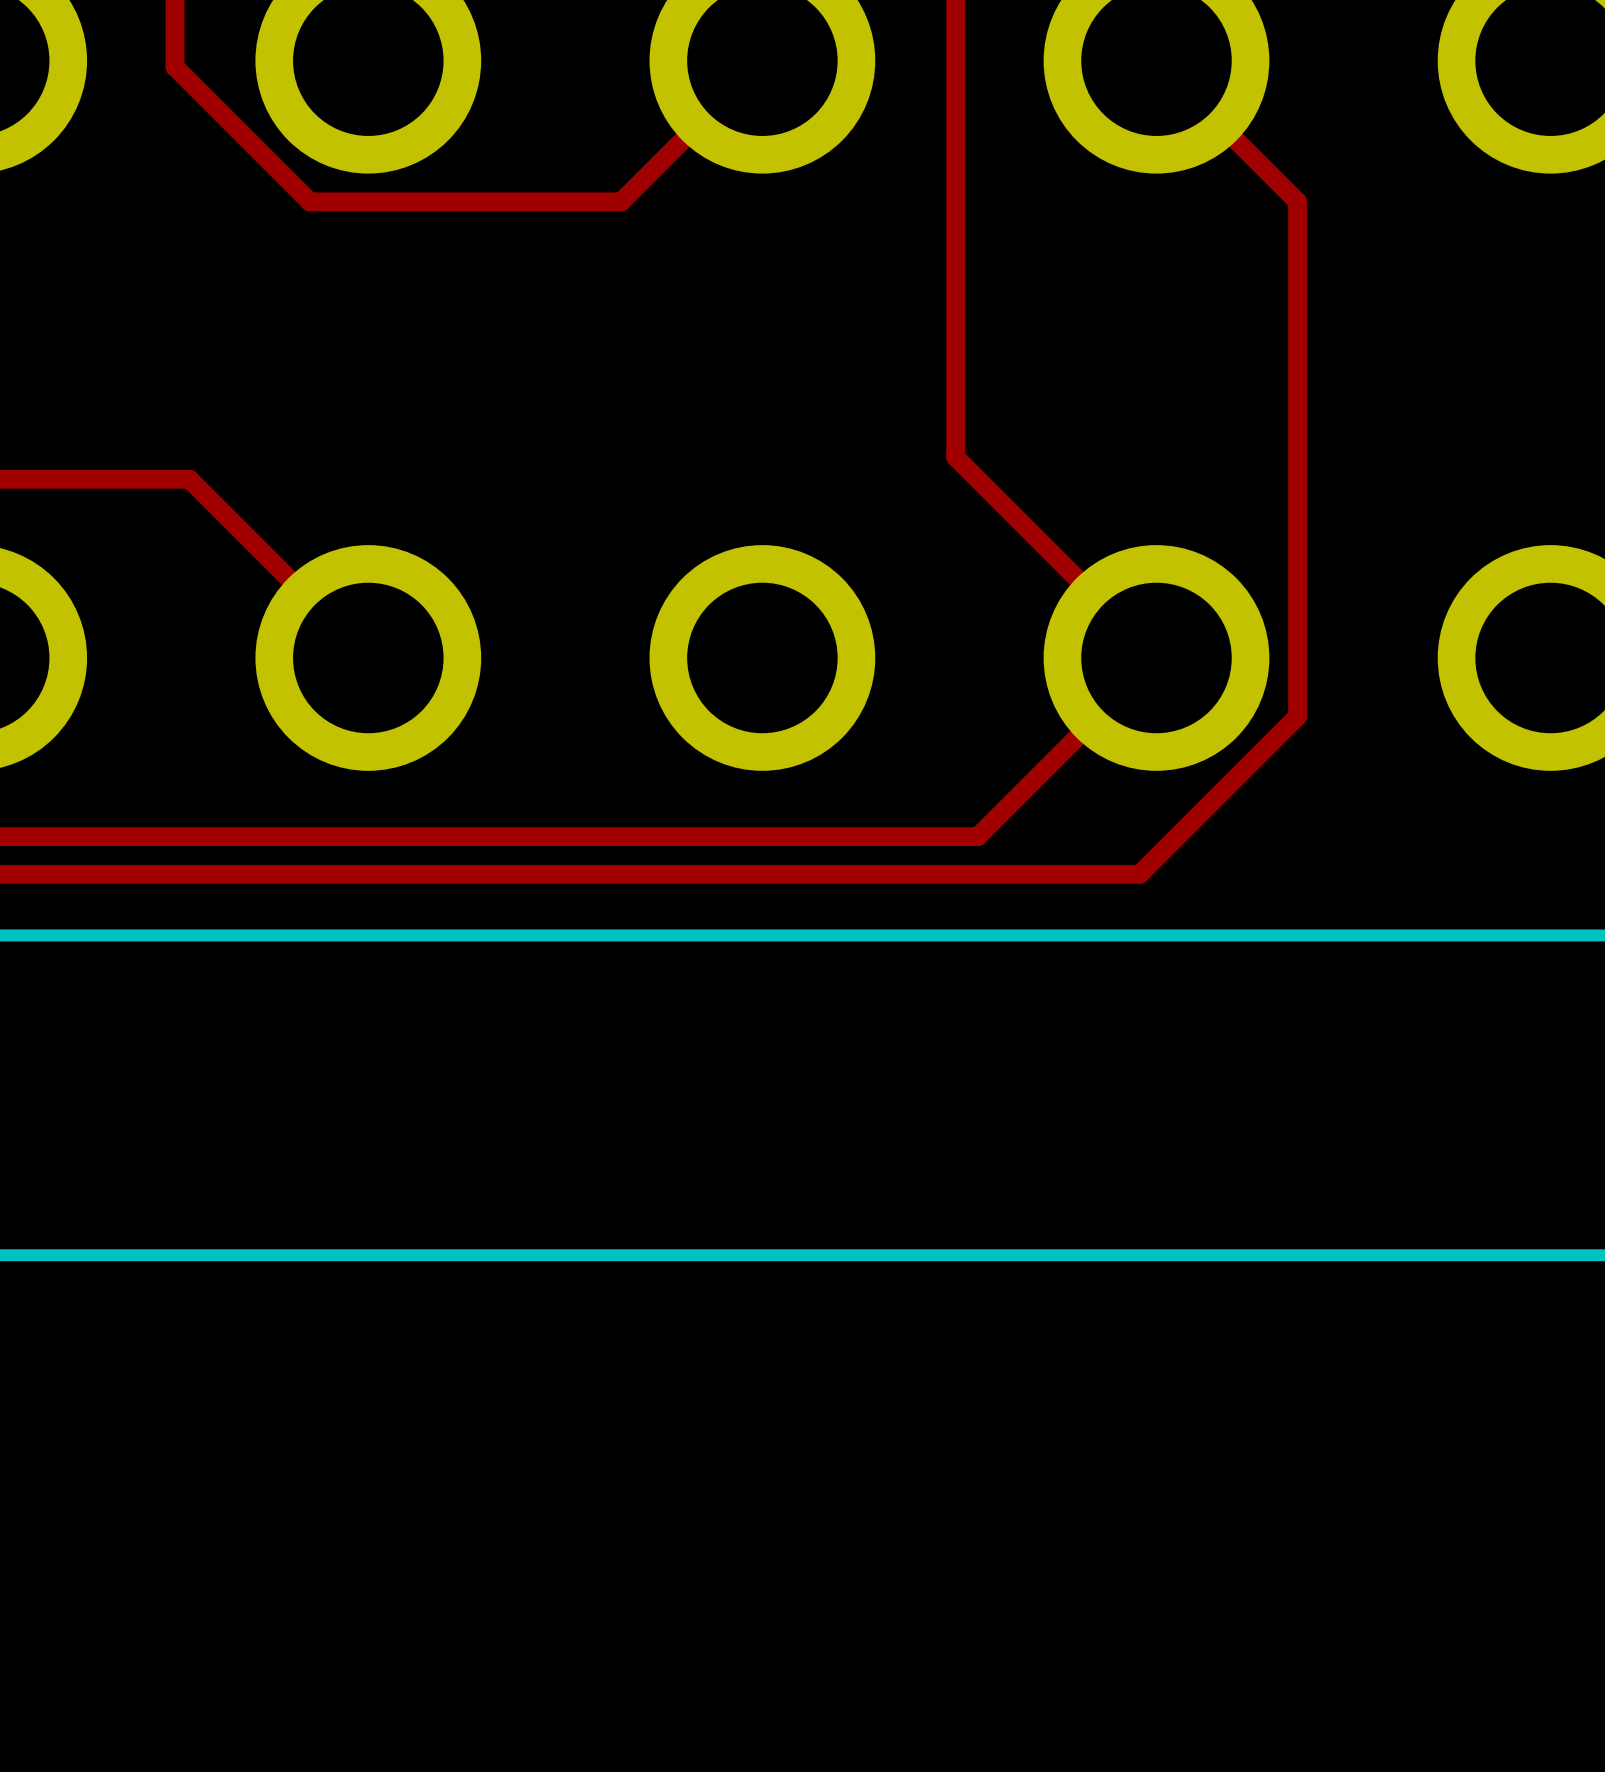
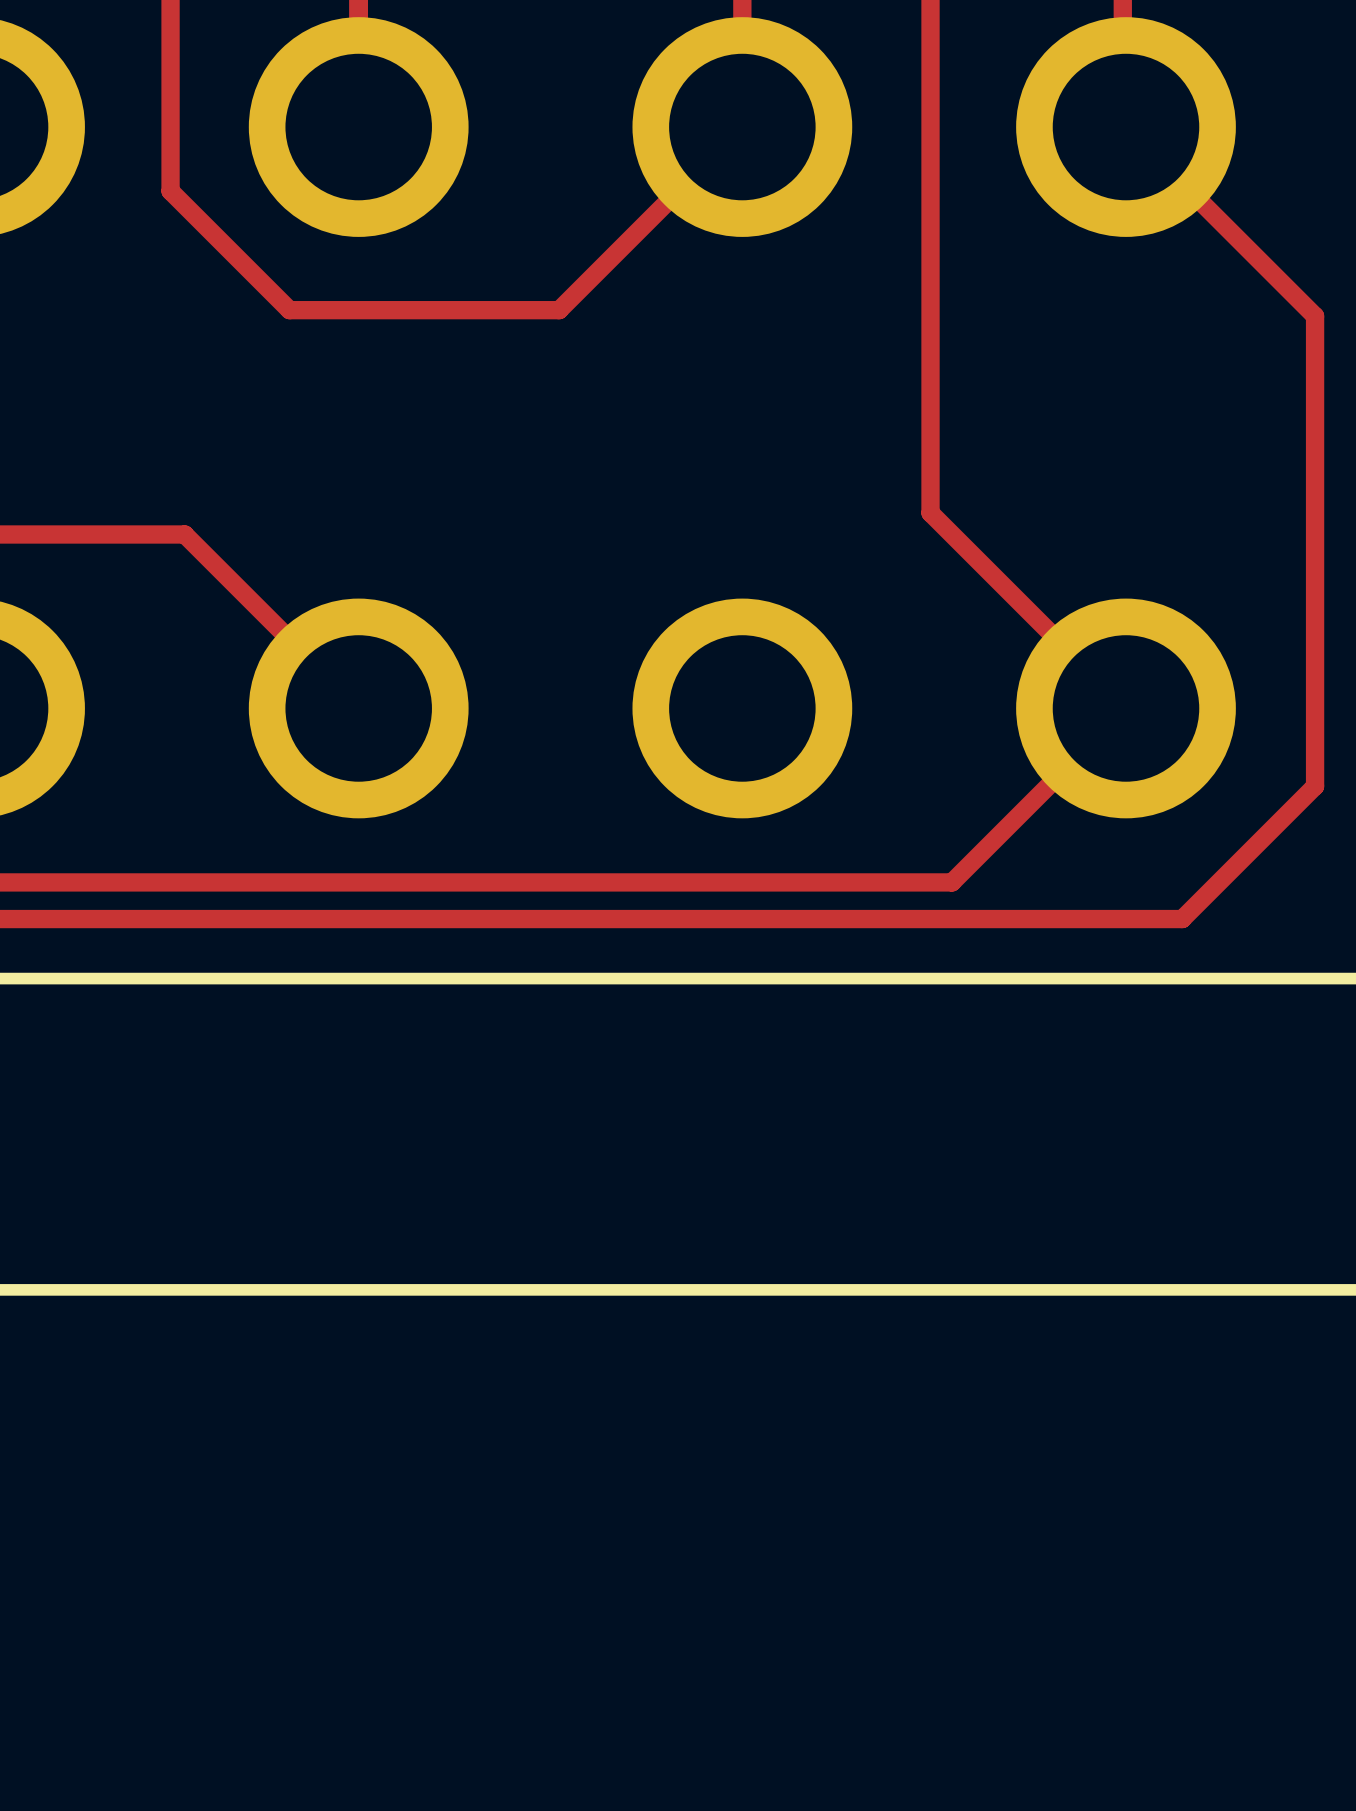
top track: (175, 66) (309, 201) (621, 201) -> (170, 133) (170, 191) (289, 310) (559, 310) (605, 264)
top track: (1297, 201) (1297, 716) (1139, 874) -> (1263, 264) (1315, 316) (1315, 786) (1182, 919) (1109, 919)

